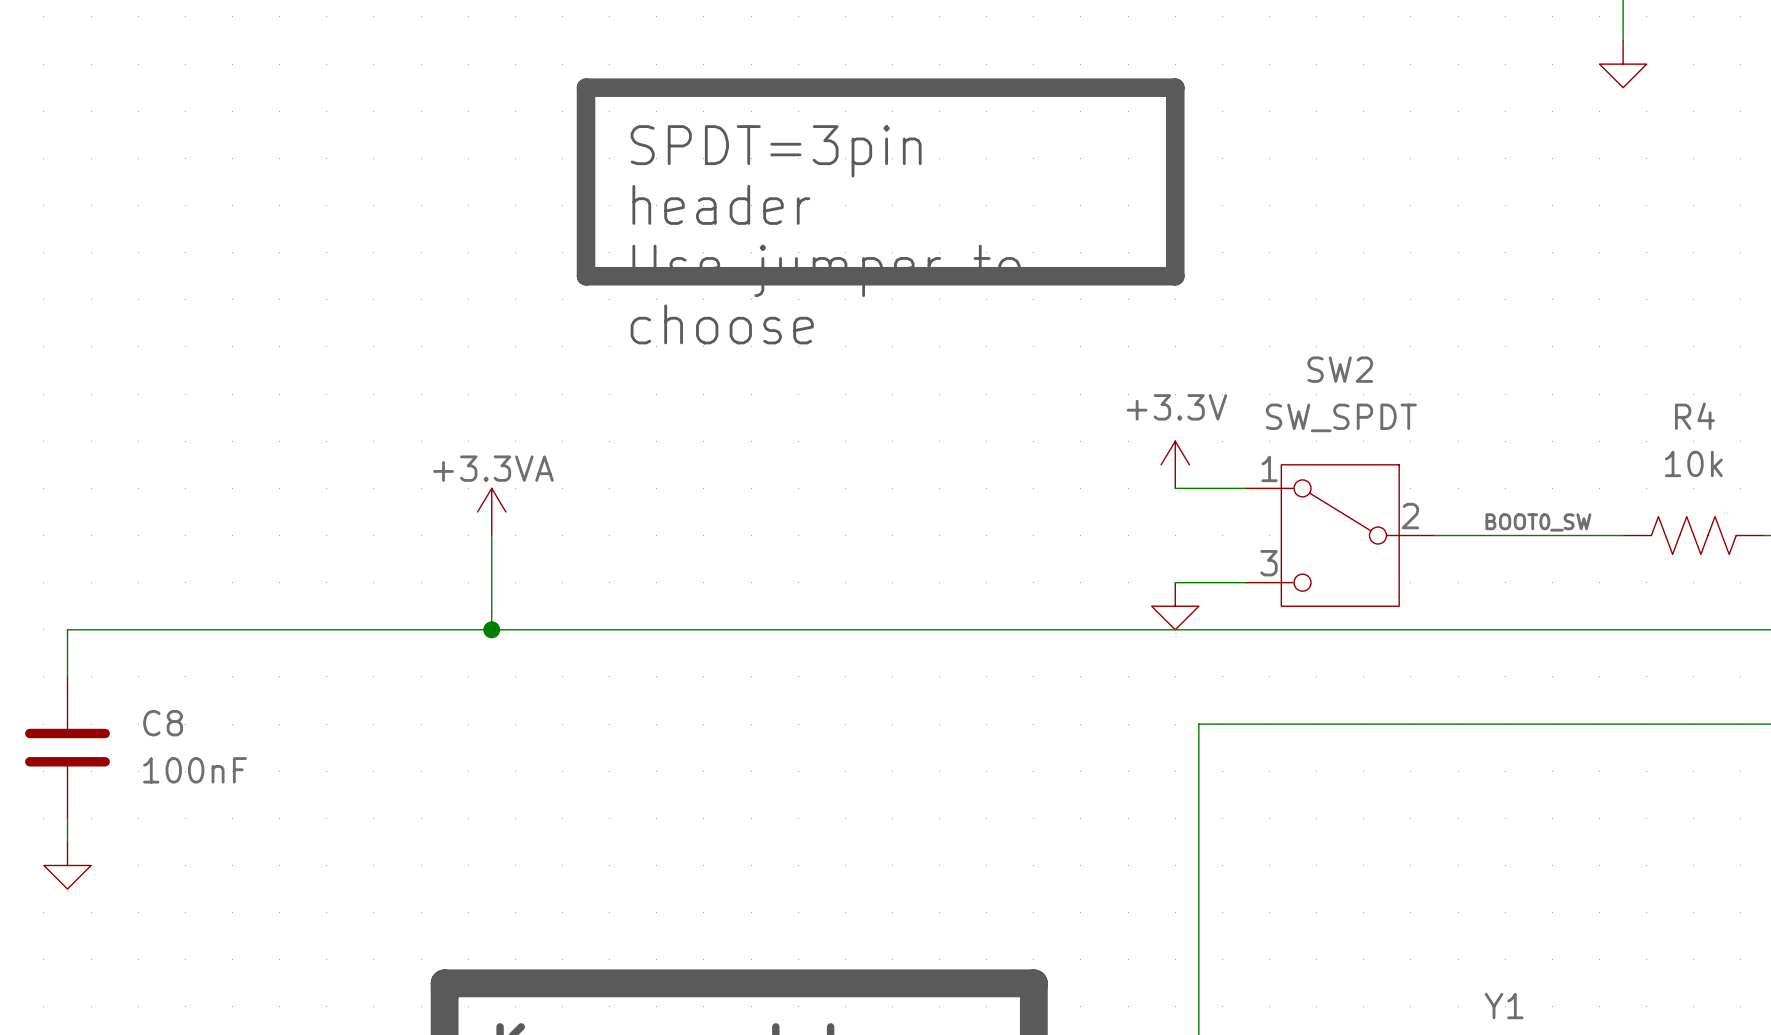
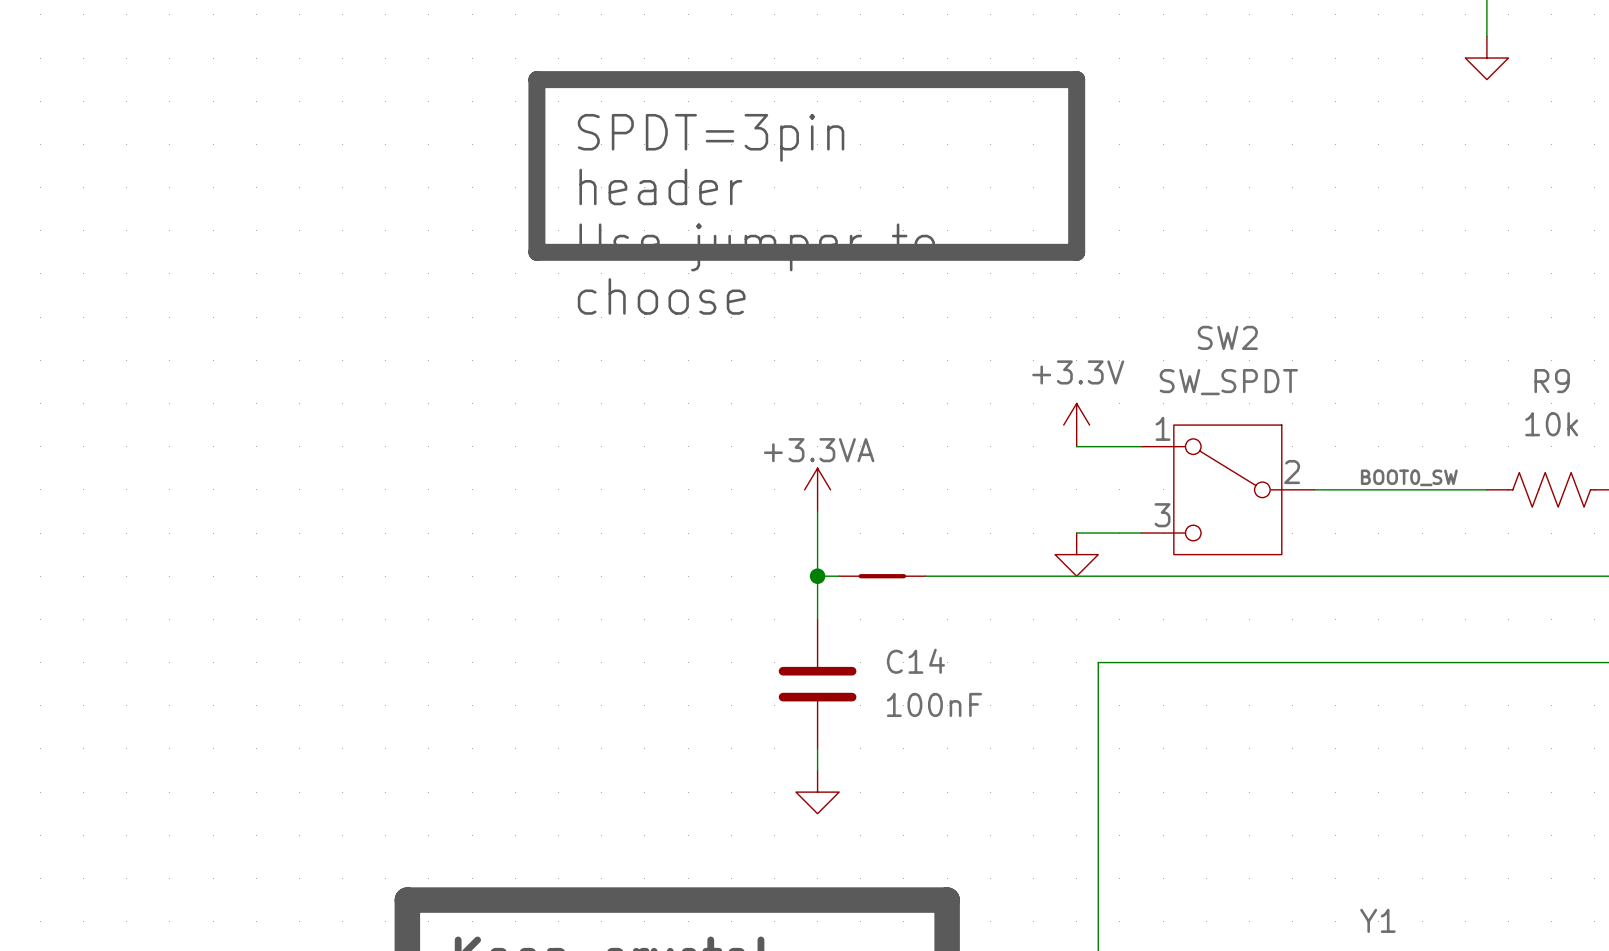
R4 name: R4 (1694, 416) -> R9 (1552, 381)
power symbol position: +3.3VA (491, 511) -> +3.3VA (817, 489)
wire: (491, 535) (491, 629) -> none
wire: none -> (817, 511) (817, 619)
junction: (491, 629) -> none
wire: (892, 629) (67, 629) (67, 676) -> none
junction: none -> (817, 576)
part: none -> (882, 576)
C8: 100nF (67, 747) -> none
C14: none -> 100nF (817, 684)
wire: (67, 818) (67, 841) -> none
wire: none -> (817, 748) (817, 770)
power symbol: (67, 865) -> none
power symbol: none -> (817, 792)

